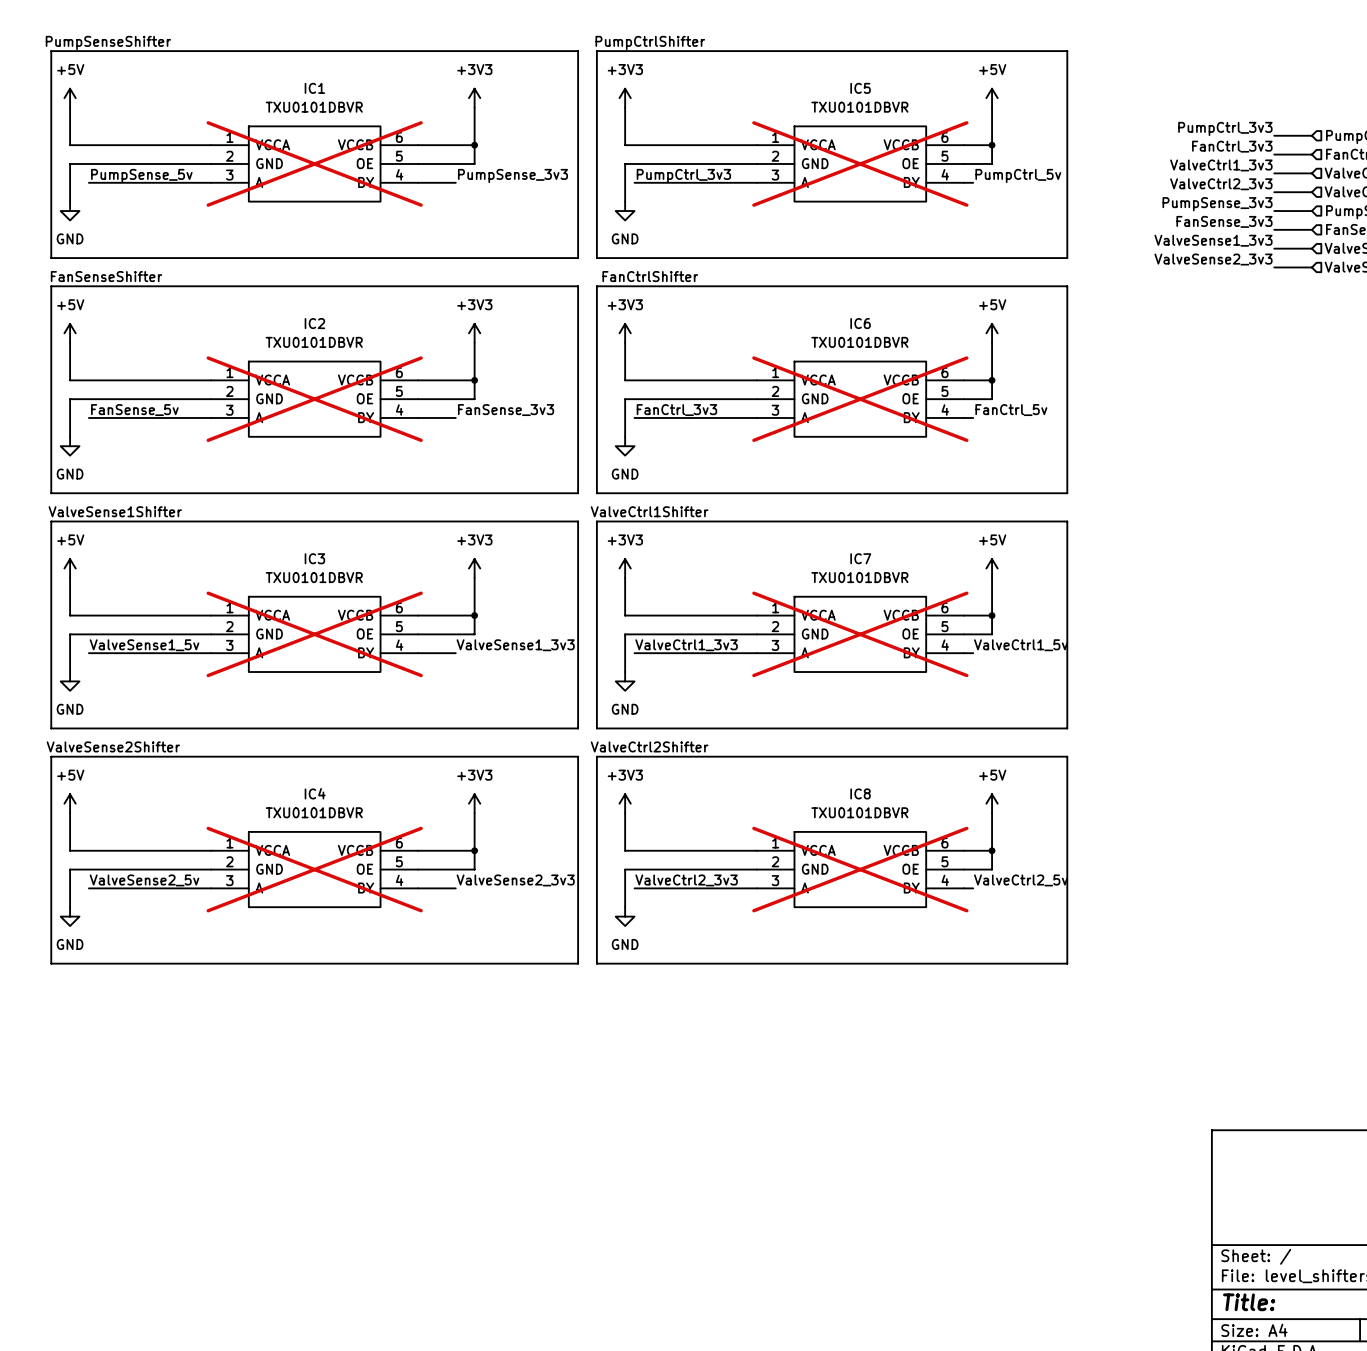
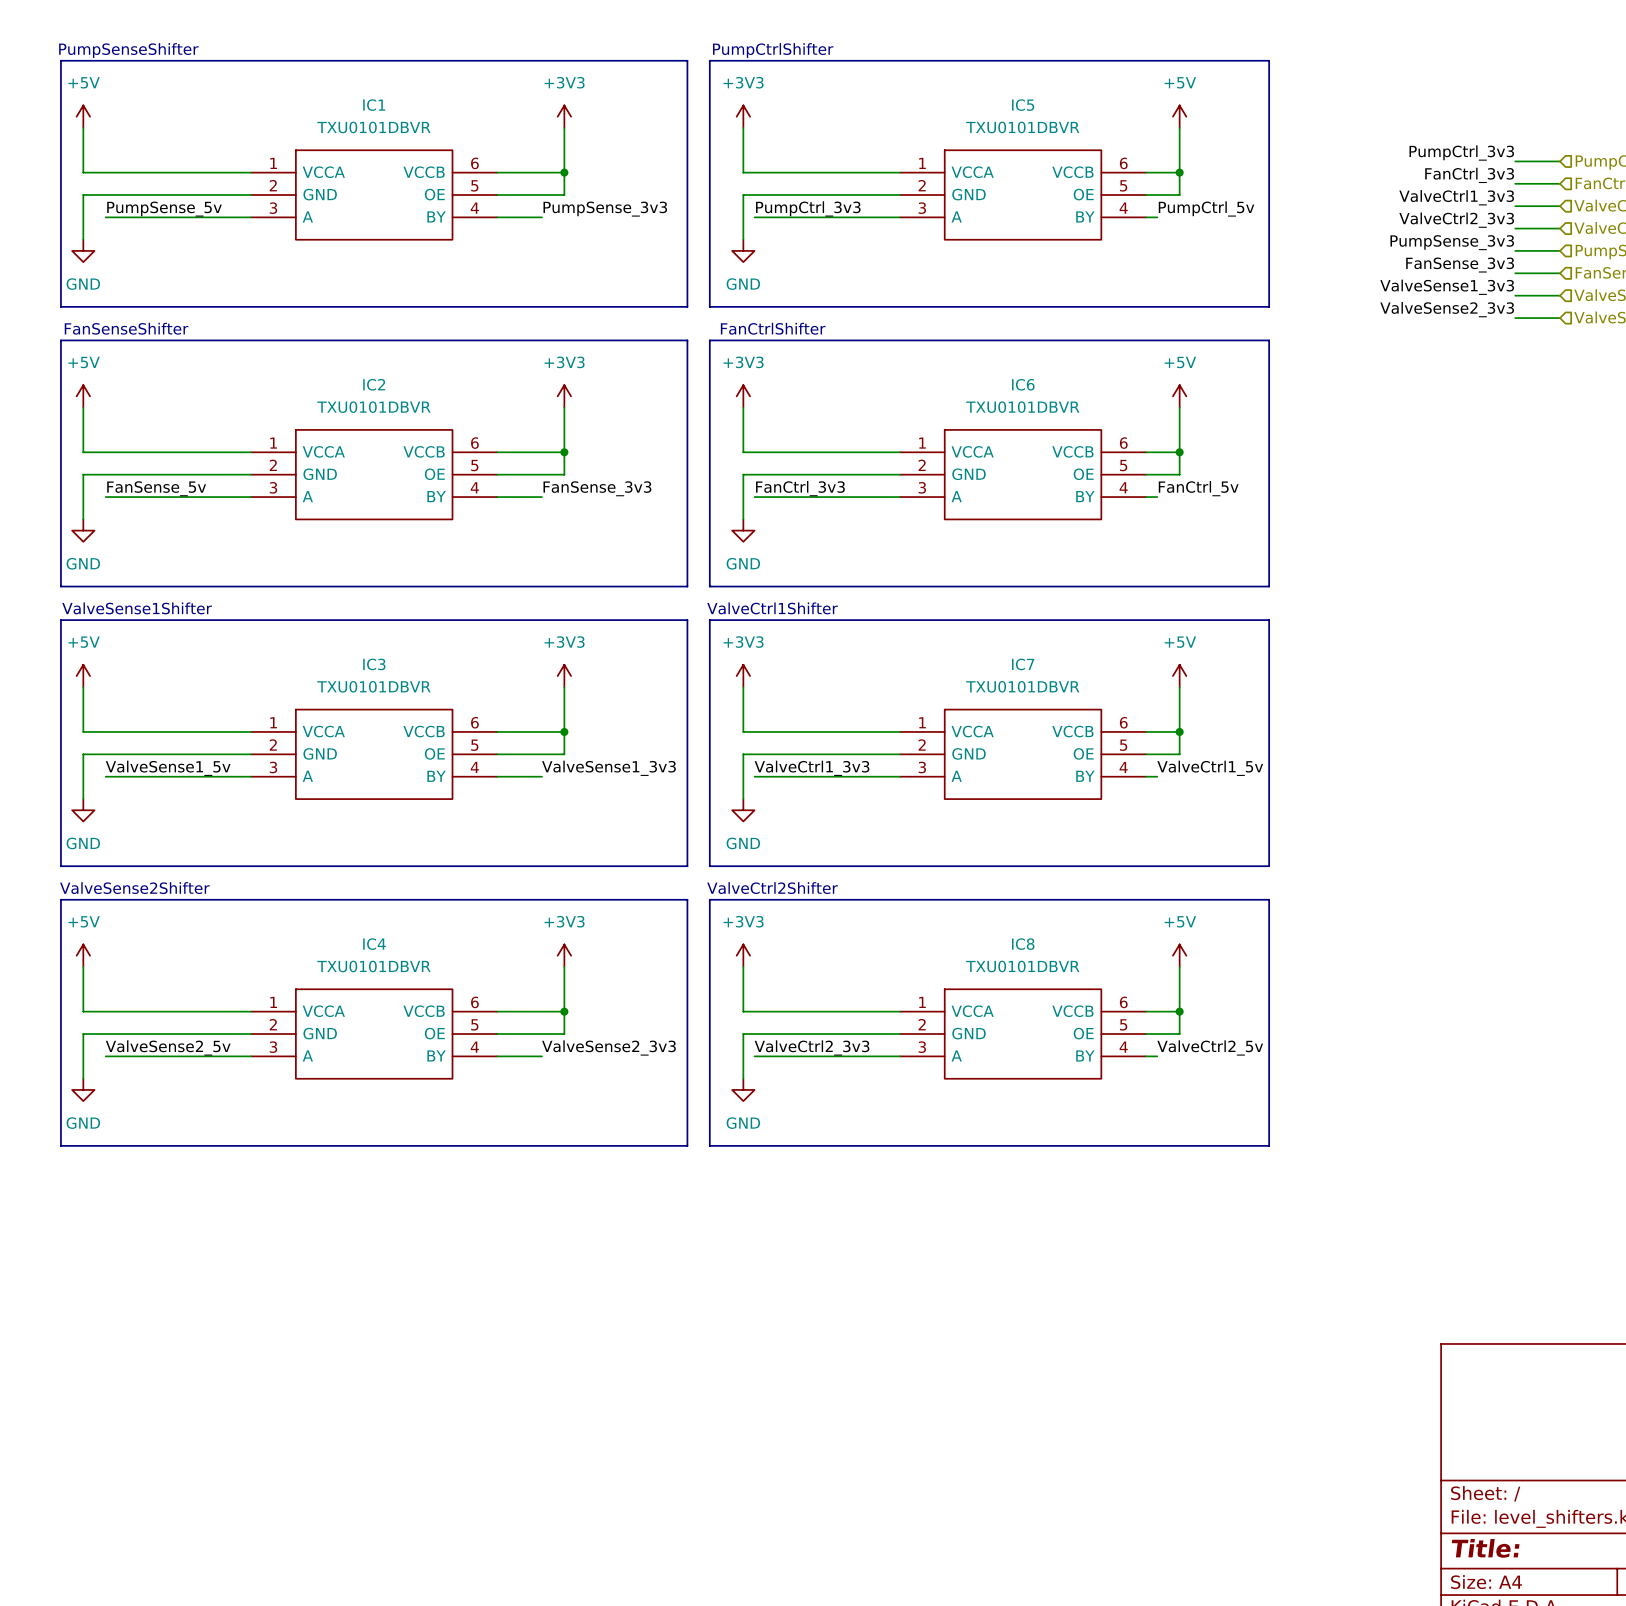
IC1 do-not-place cross: (314, 163) -> none
IC5 do-not-place cross: (860, 163) -> none
IC2 do-not-place cross: (314, 399) -> none
IC6 do-not-place cross: (860, 399) -> none
IC3 do-not-place cross: (314, 634) -> none
IC7 do-not-place cross: (860, 634) -> none
IC4 do-not-place cross: (314, 869) -> none
IC8 do-not-place cross: (860, 869) -> none

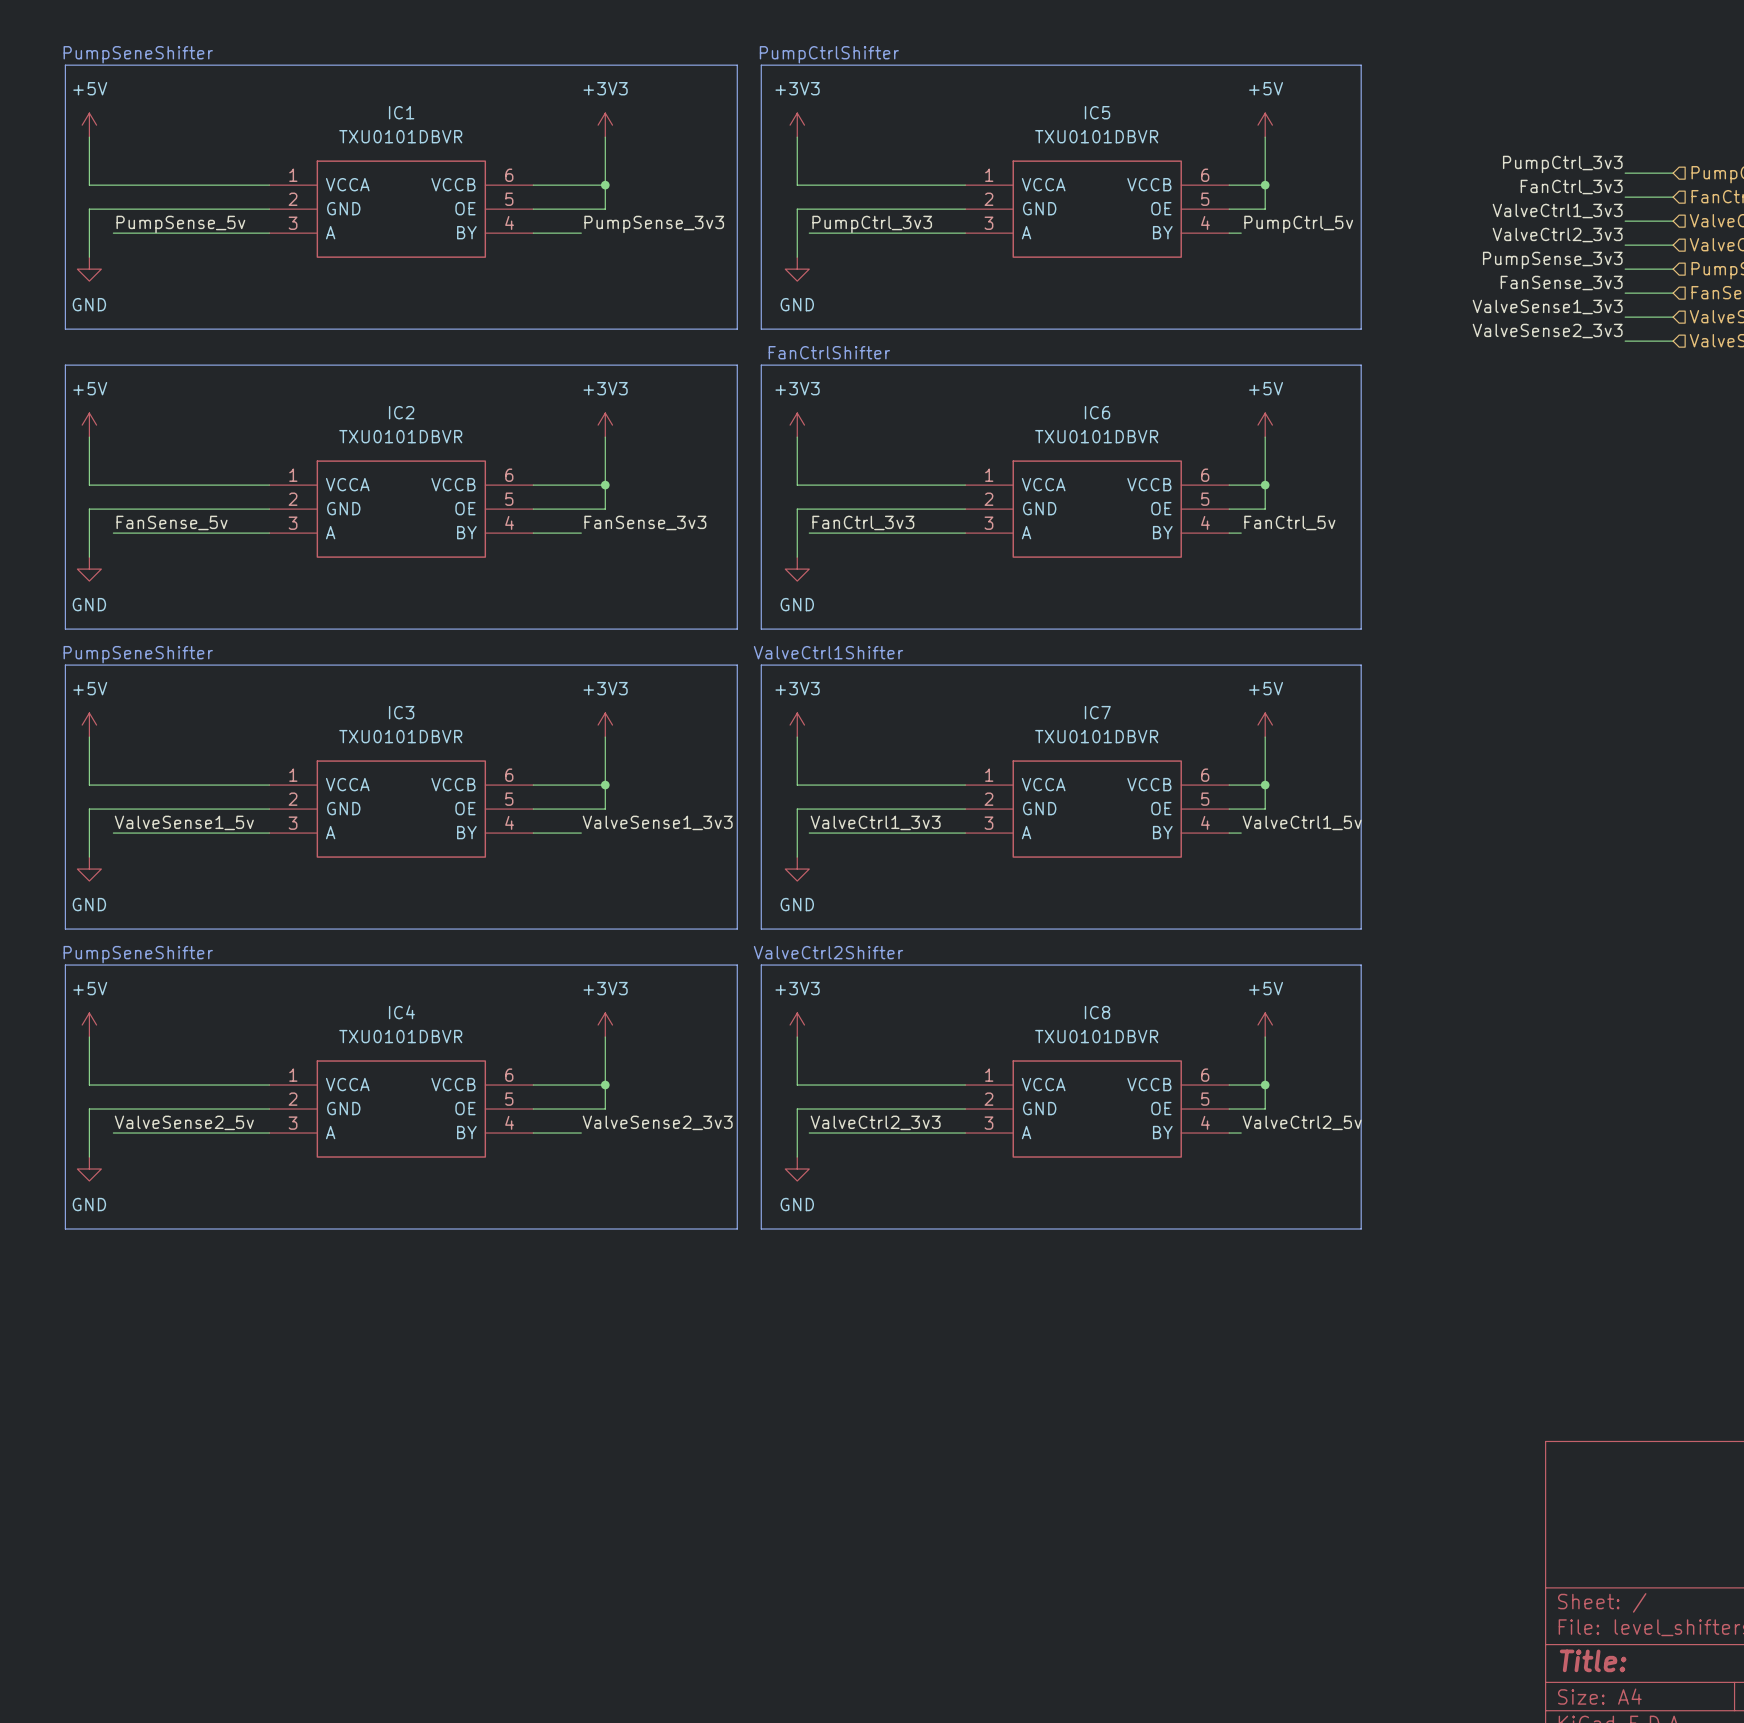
text: PumpSenseShifter (128, 50) -> PumpSeneShifter (138, 54)
text: FanSenseShifter (126, 328) -> none
text: ValveSense1Shifter (137, 608) -> PumpSeneShifter (138, 654)
text: ValveSense2Shifter (134, 888) -> PumpSeneShifter (138, 954)

